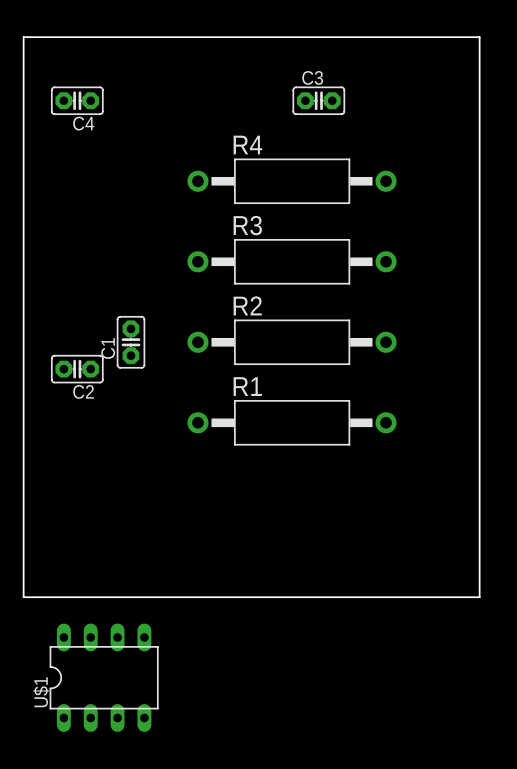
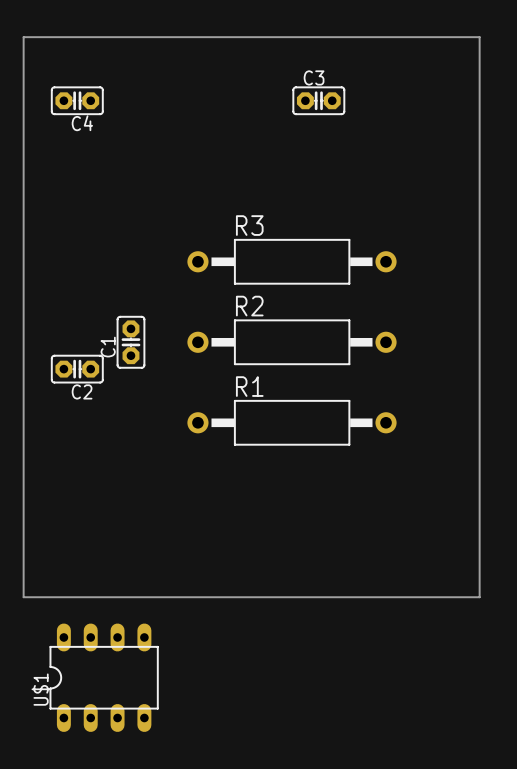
R4: (291, 181) -> none

